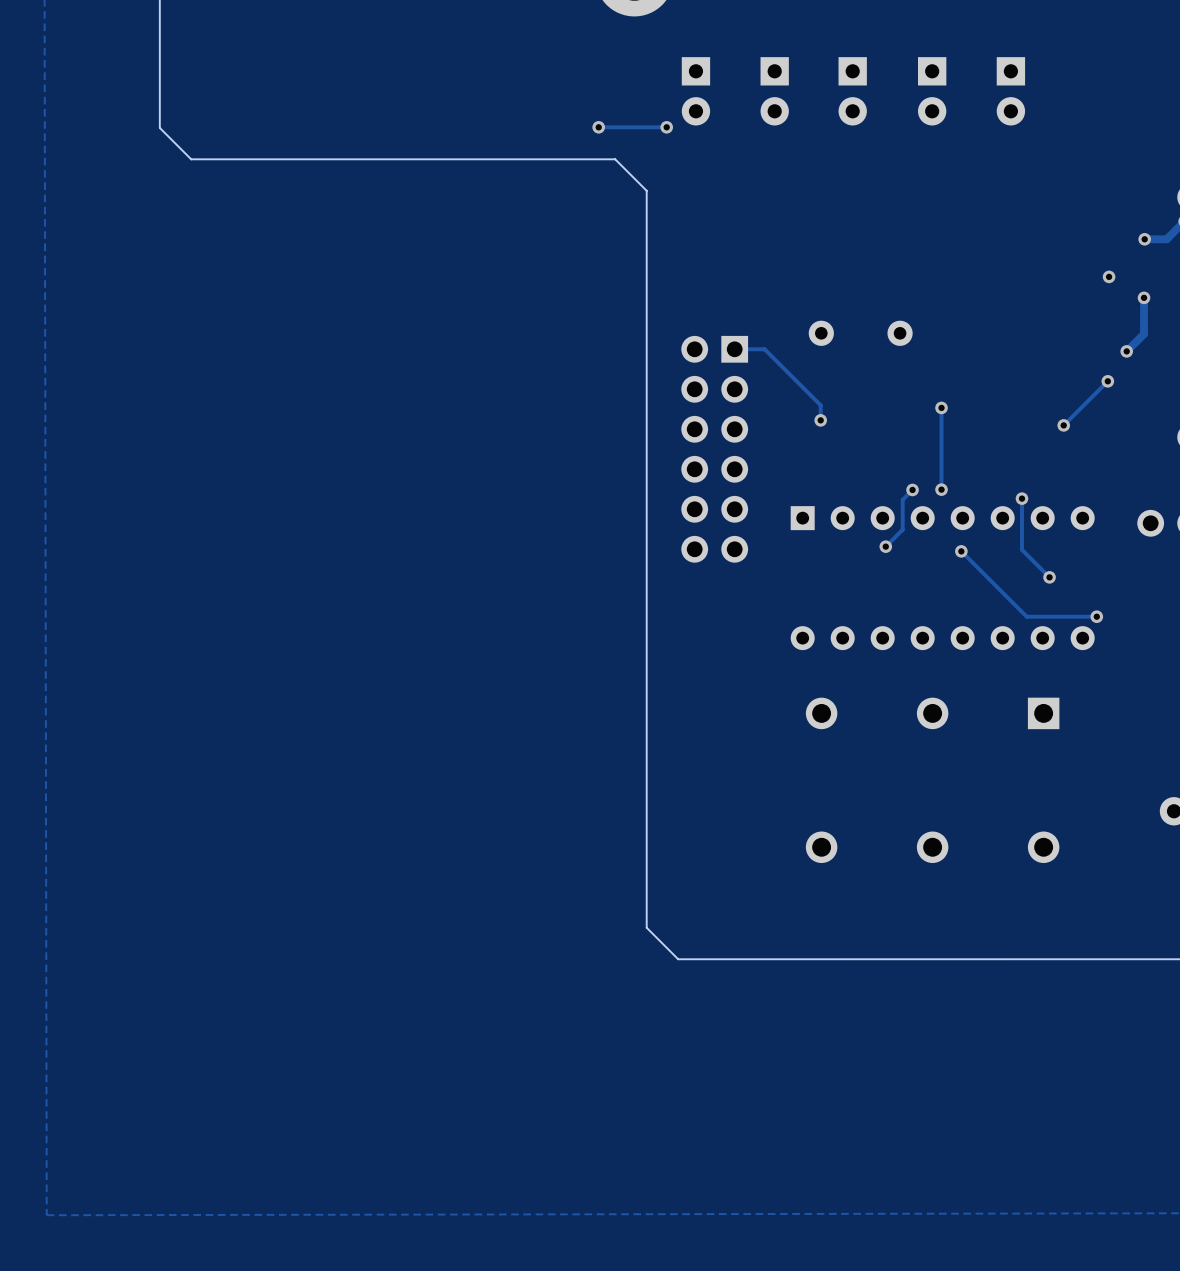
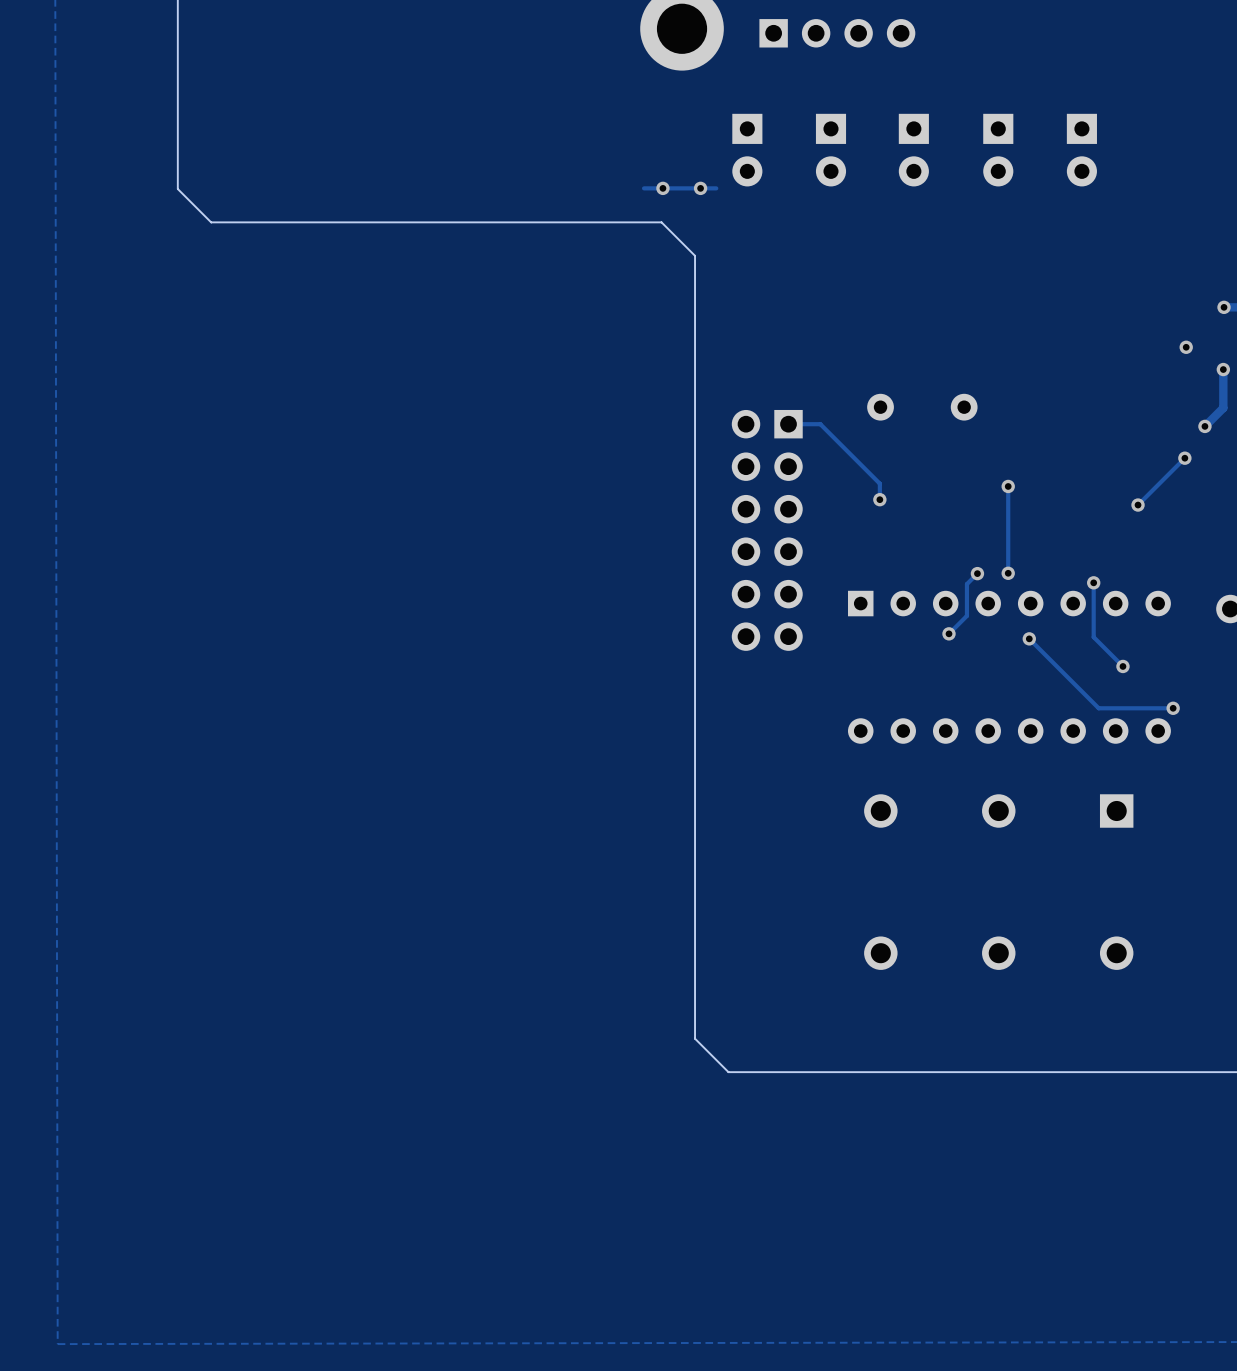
via position: (598, 127) -> (662, 188)
via position: (666, 127) -> (700, 188)

